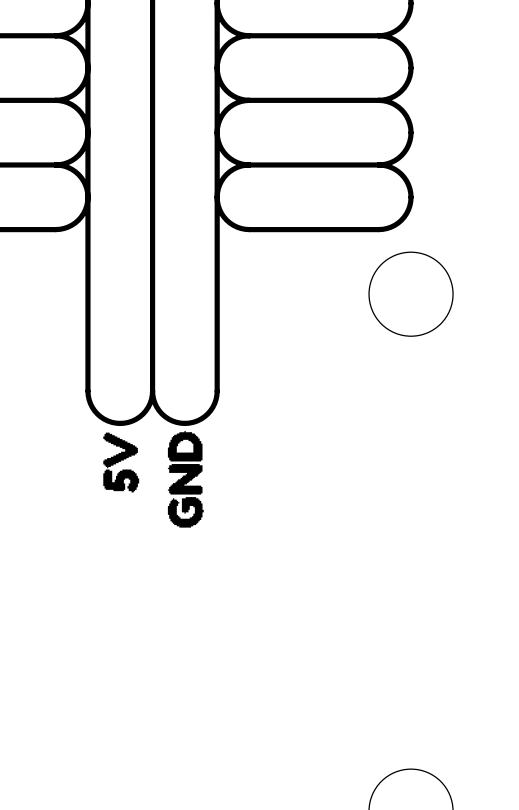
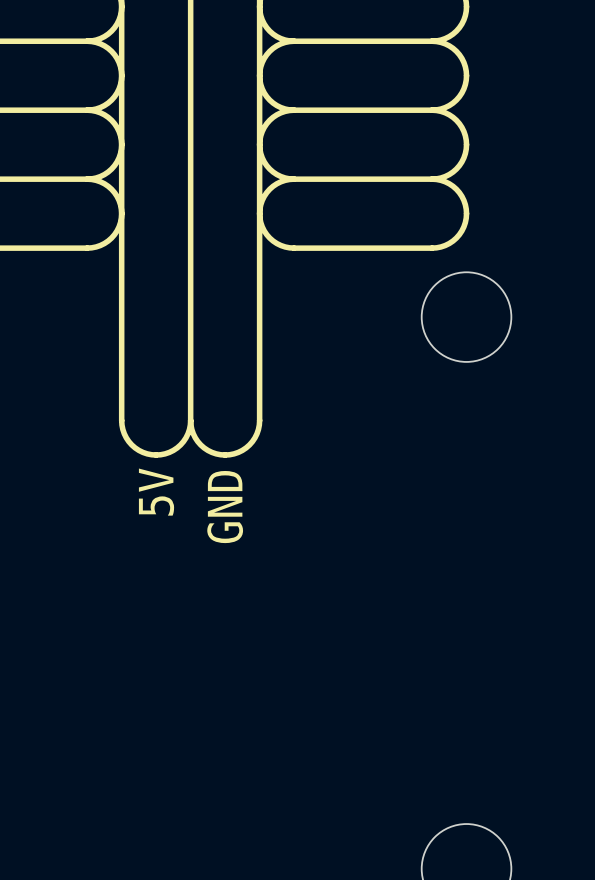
drawing: [103, 430, 204, 528] -> none
text: none -> 5V (156, 492)
text: none -> GND (225, 507)

